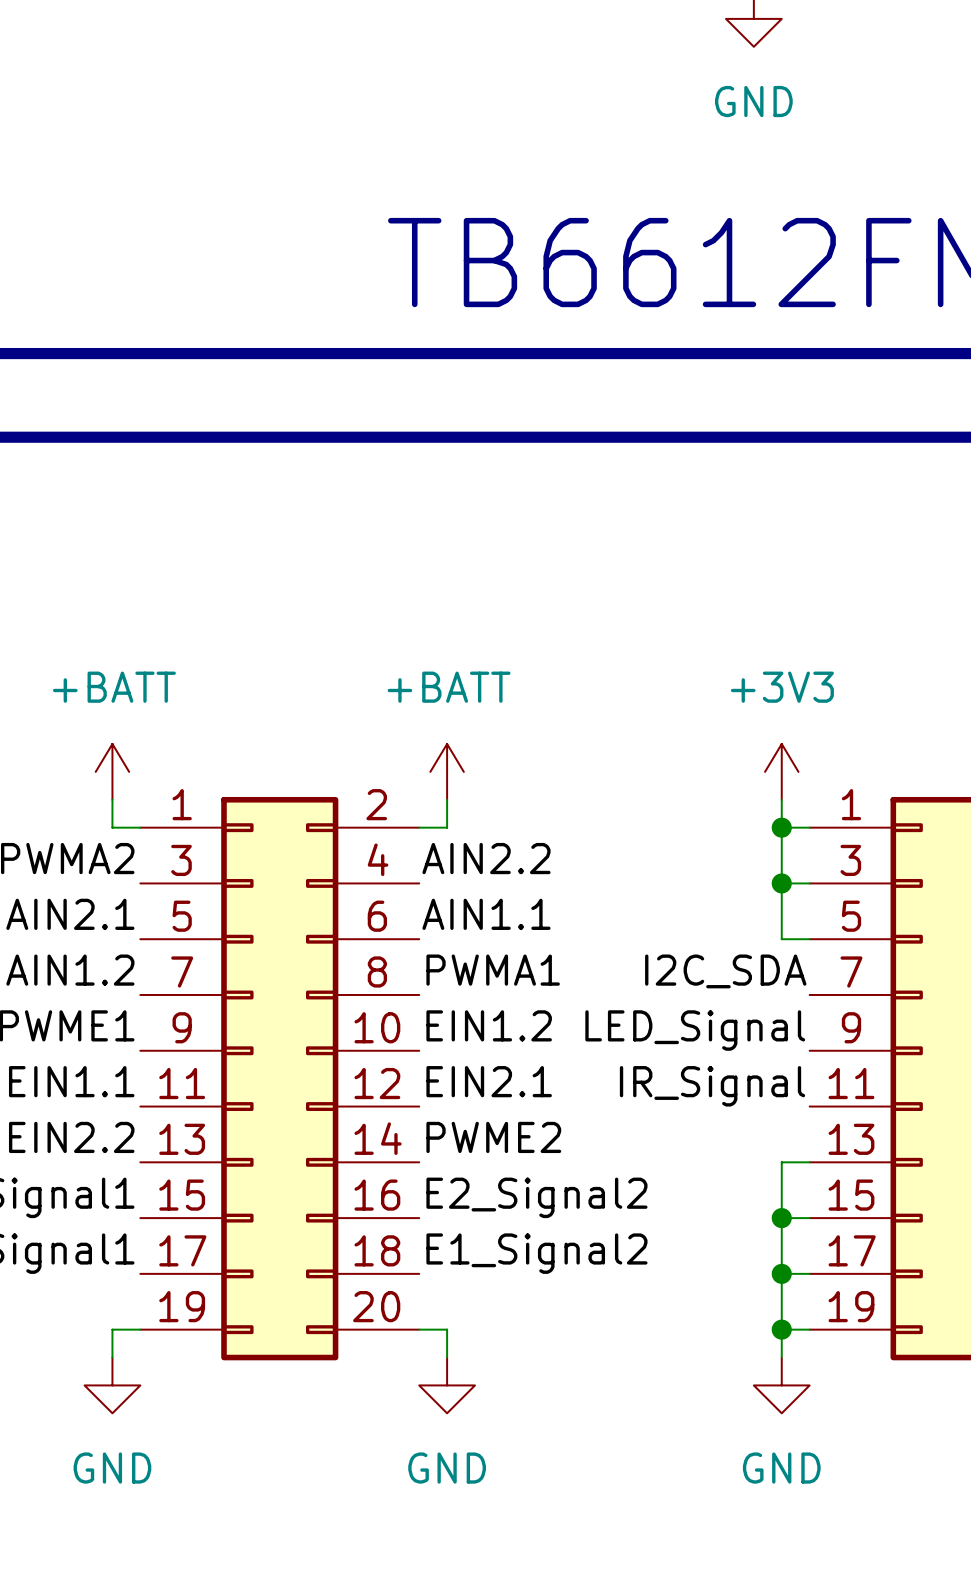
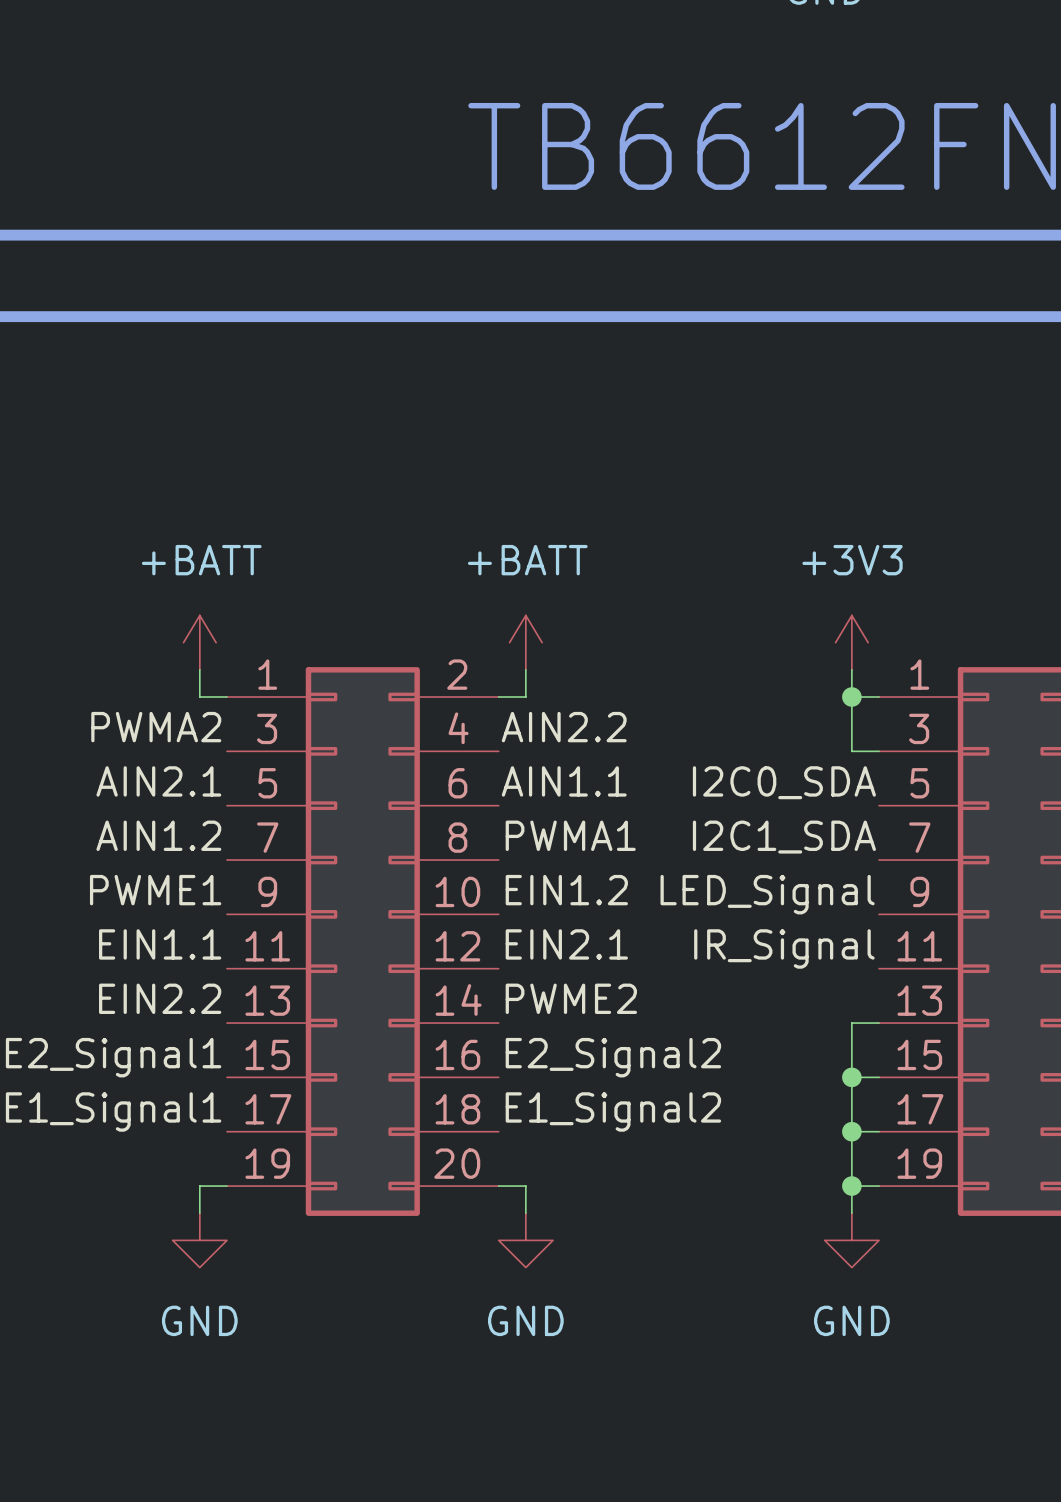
wire: (781, 883) (781, 939) (809, 939) -> none
junction: (781, 883) -> none
label: none -> I2C0_SDA (784, 782)
label: I2C_SDA (725, 971) -> I2C1_SDA (784, 837)

